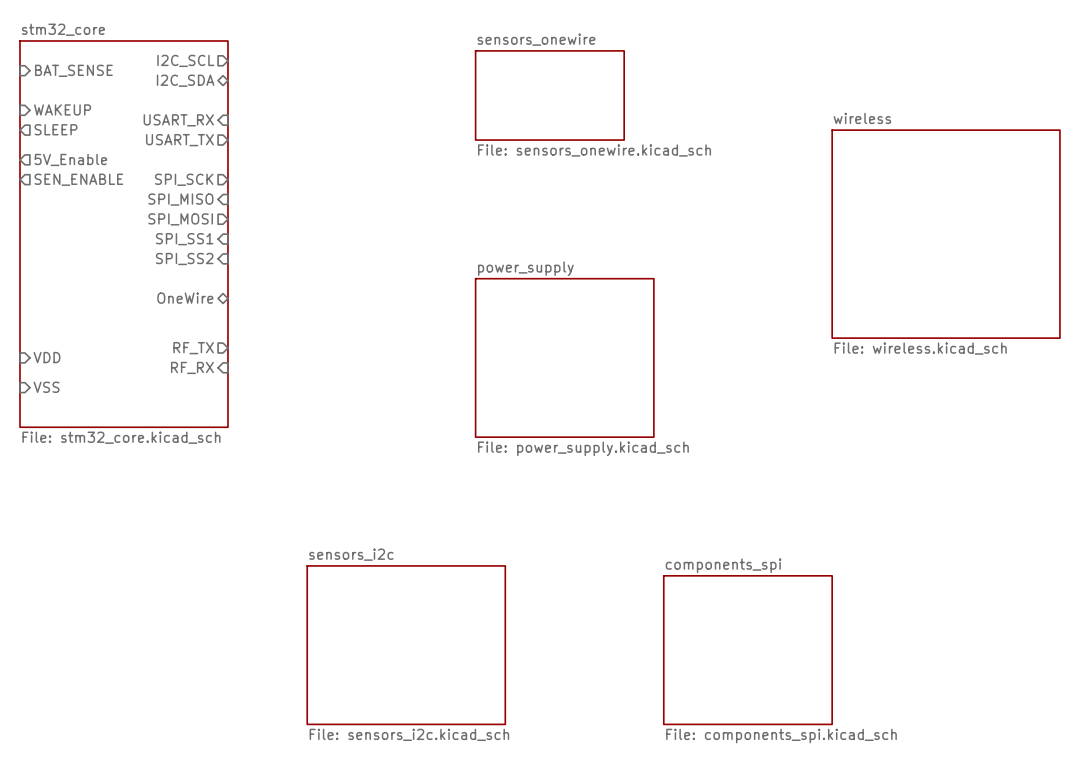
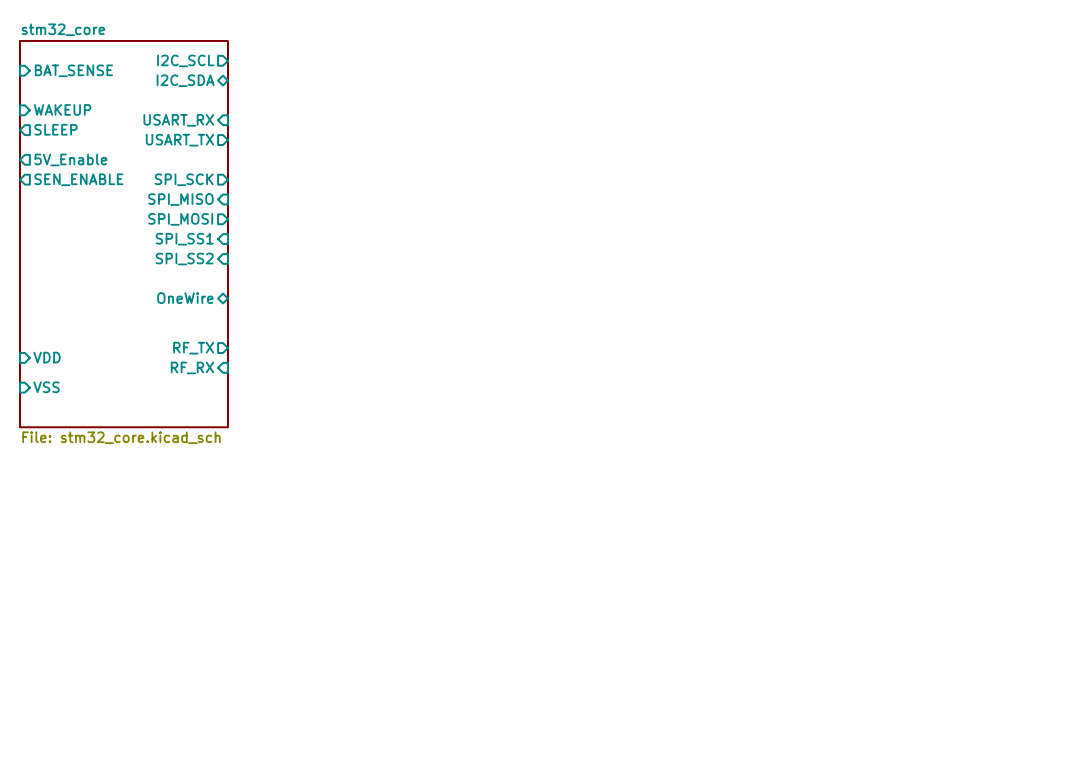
sheet sensors_onewire: File: sensors_onewire.kicad_sch (549, 95) -> none
sheet wireless: File: wireless.kicad_sch (946, 234) -> none
sheet power_supply: File: power_supply.kicad_sch (564, 357) -> none
sheet sensors_i2c: File: sensors_i2c.kicad_sch (406, 645) -> none
sheet components_spi: File: components_spi.kicad_sch (747, 650) -> none

